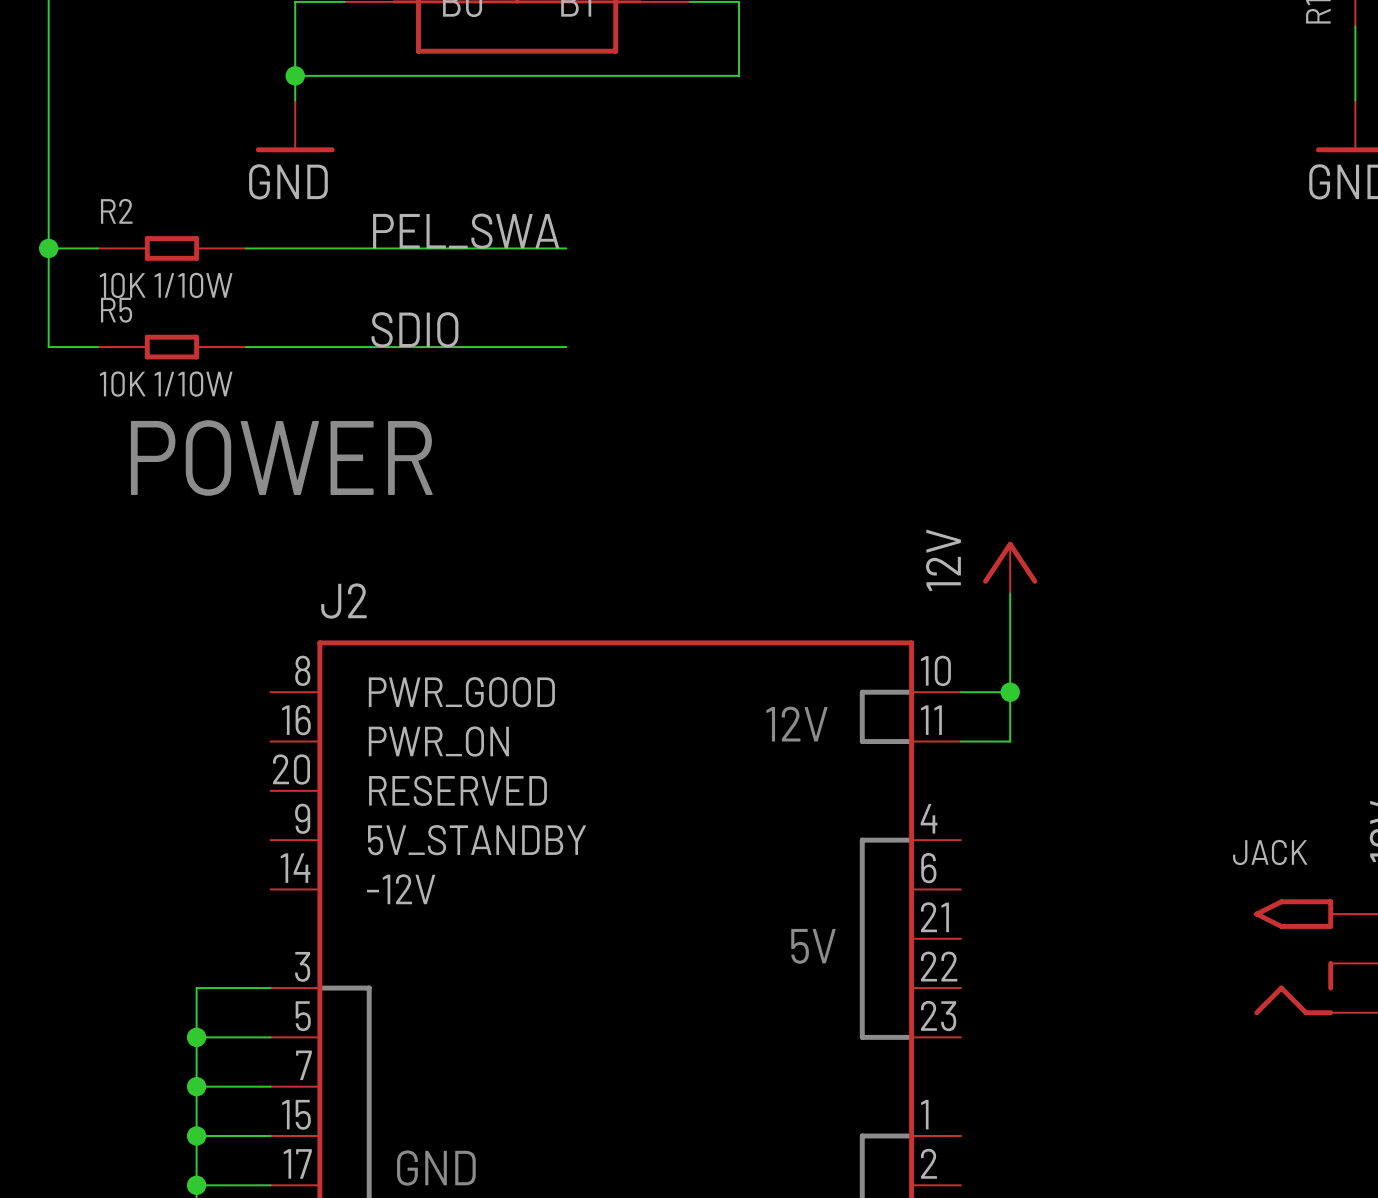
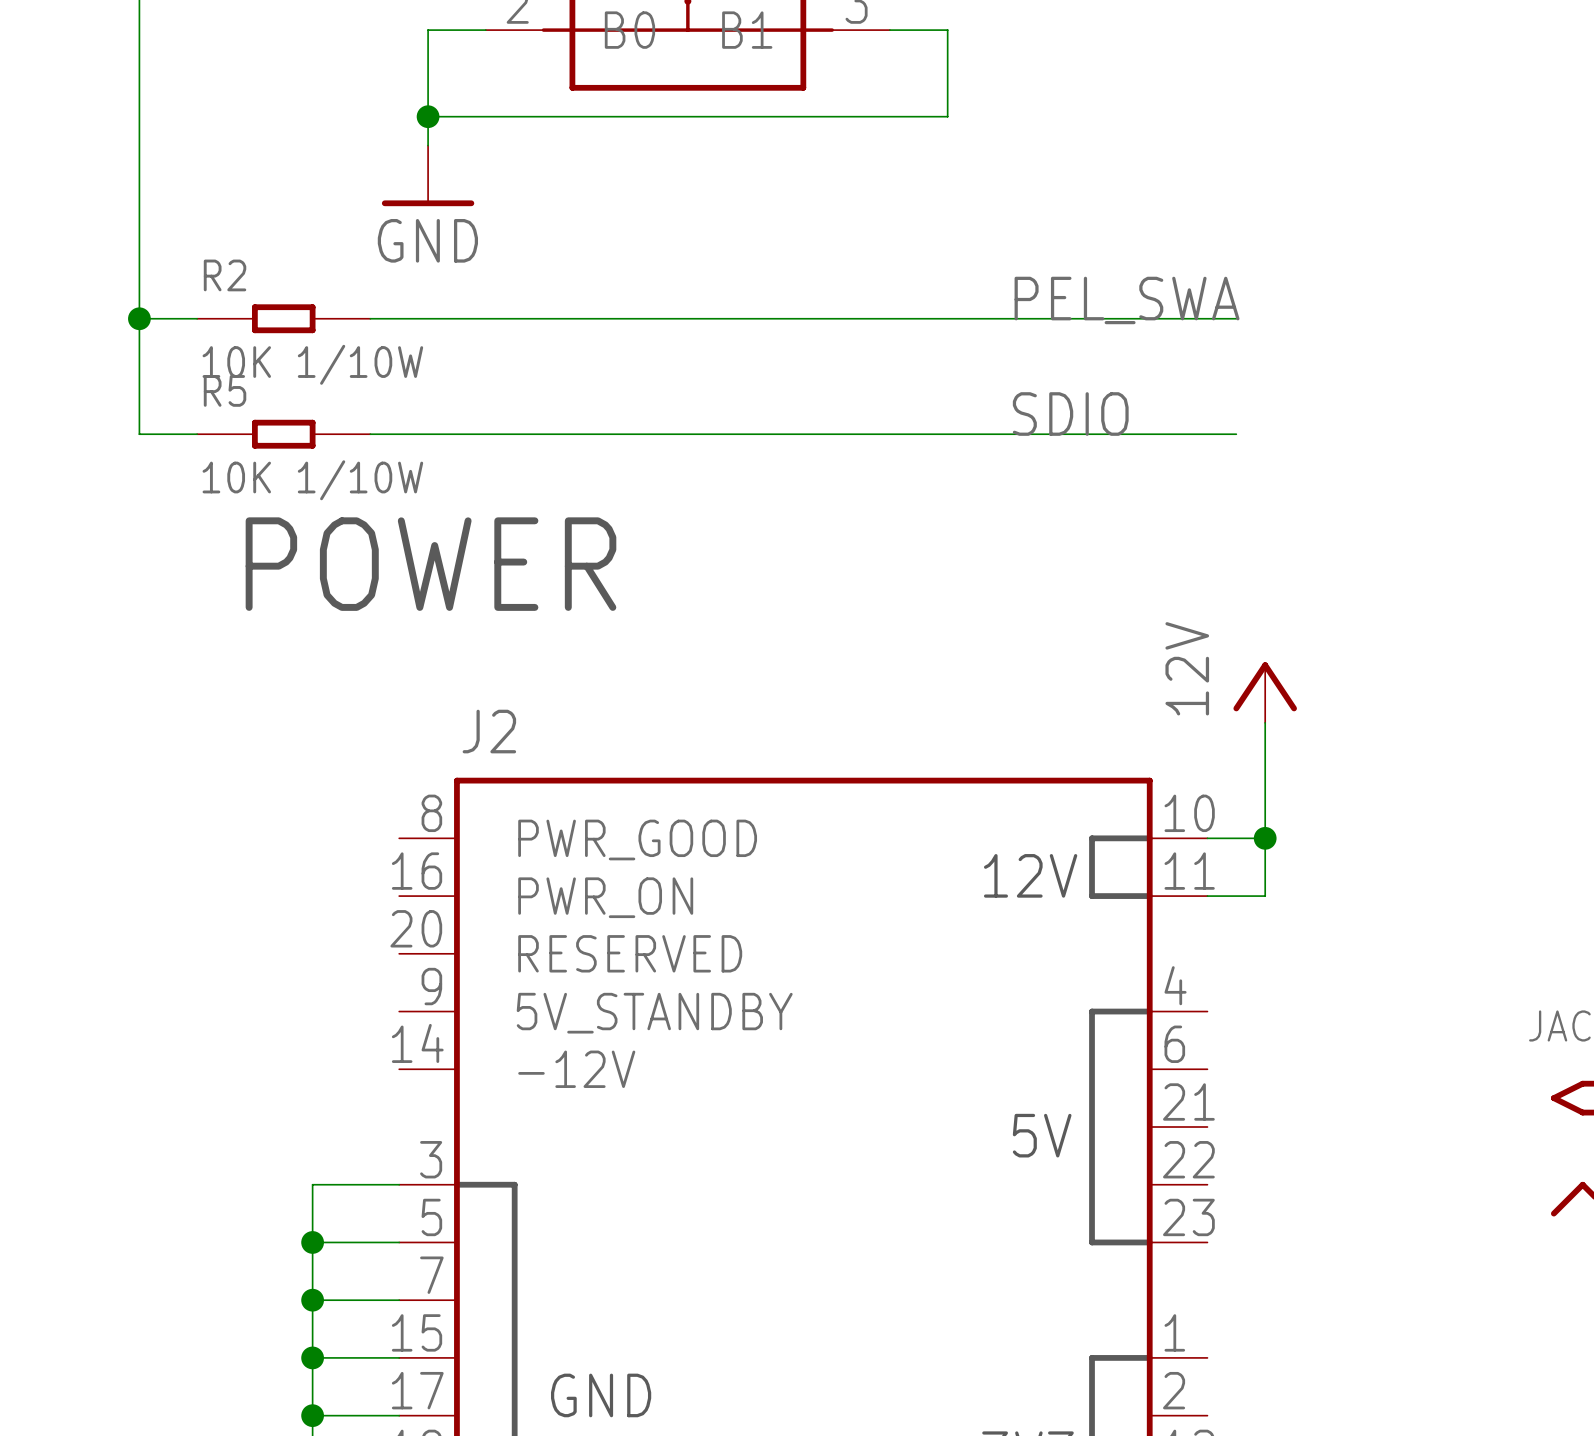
label position: PEL_SWA (466, 231) -> PEL_SWA (1127, 300)
wire: none -> (745, 318) (1236, 318)
label position: SDIO (414, 329) -> SDIO (1070, 414)
wire: none -> (745, 434) (1236, 434)

